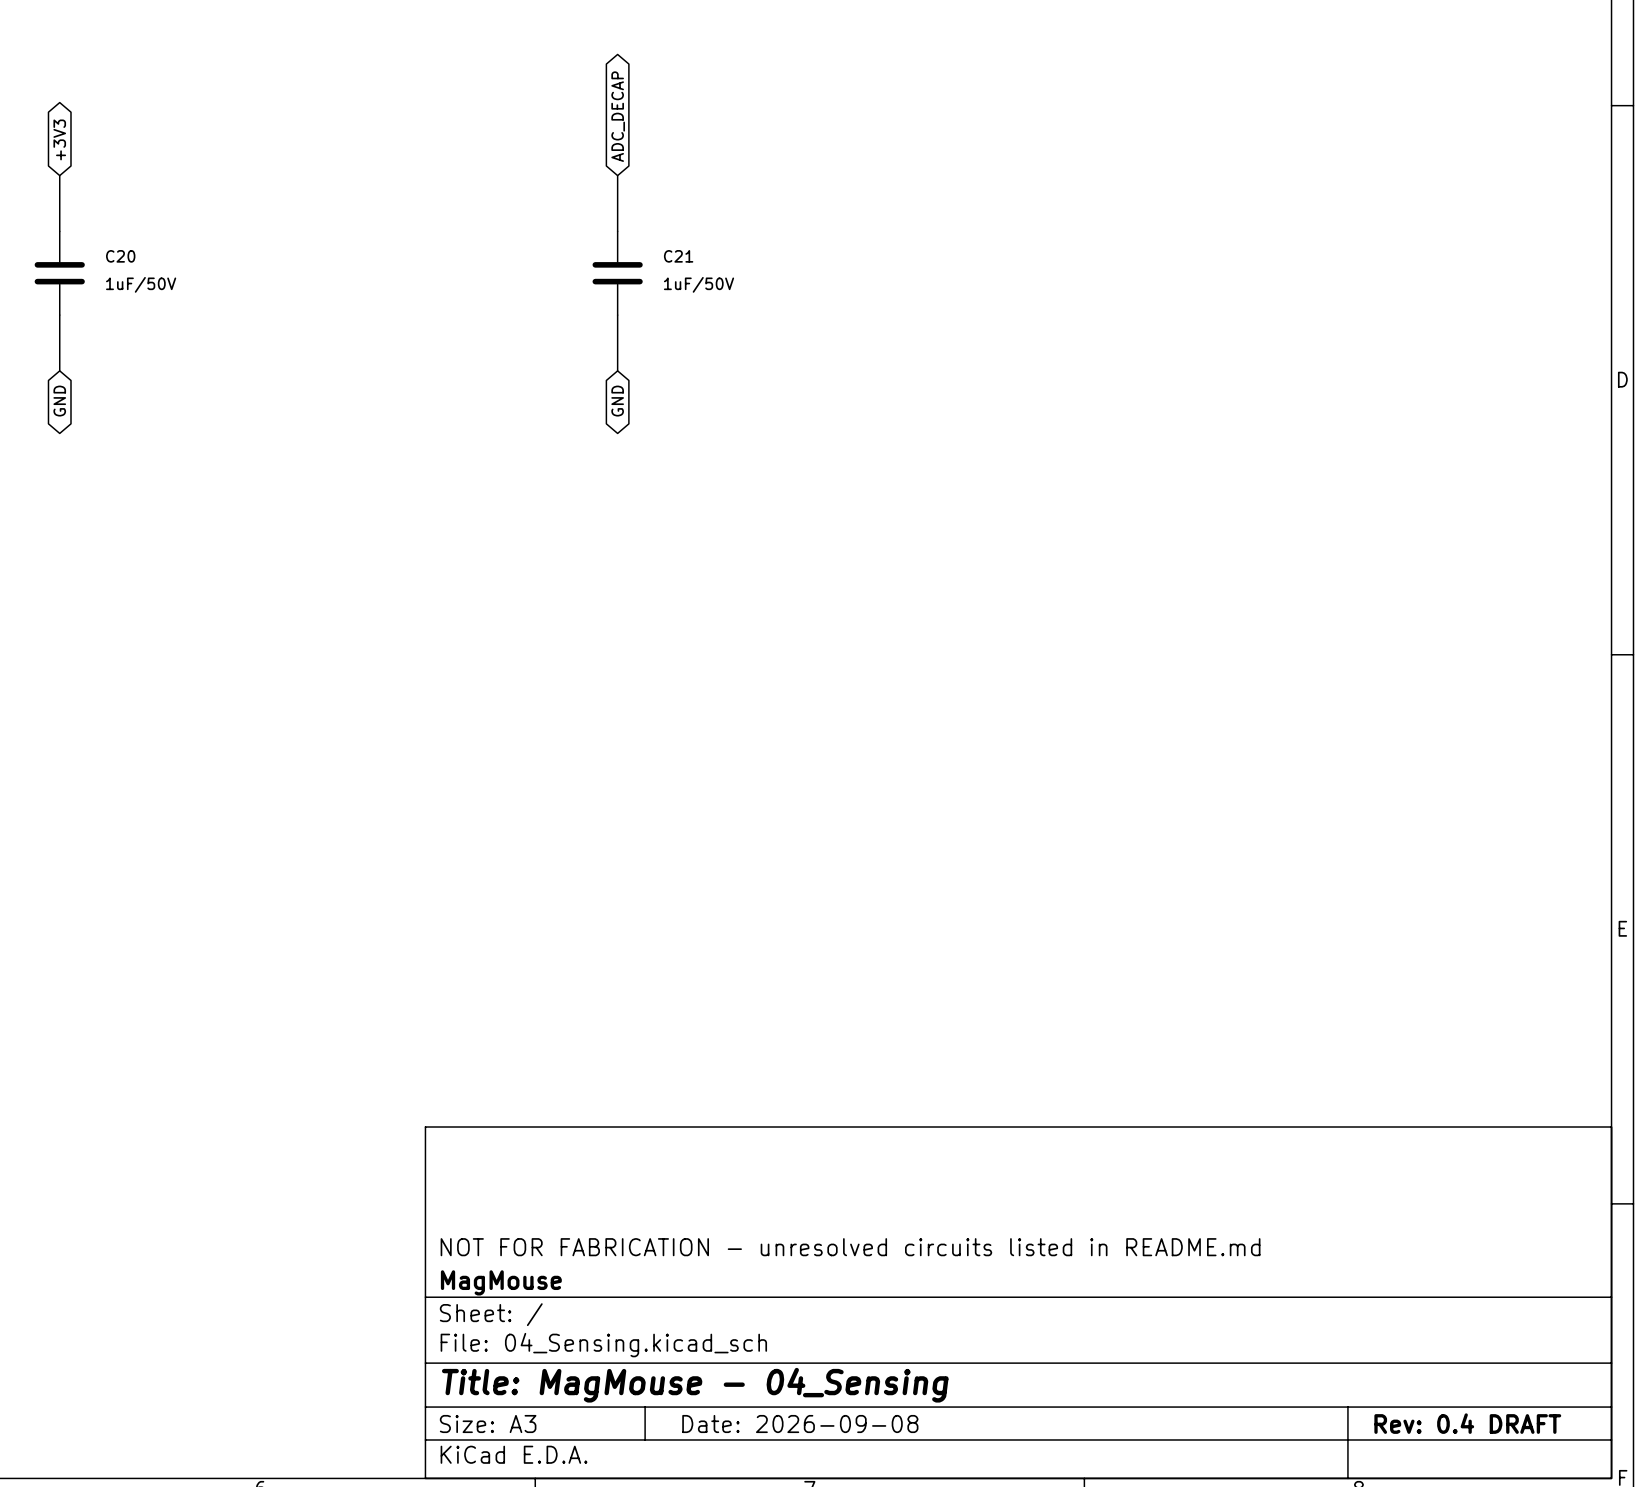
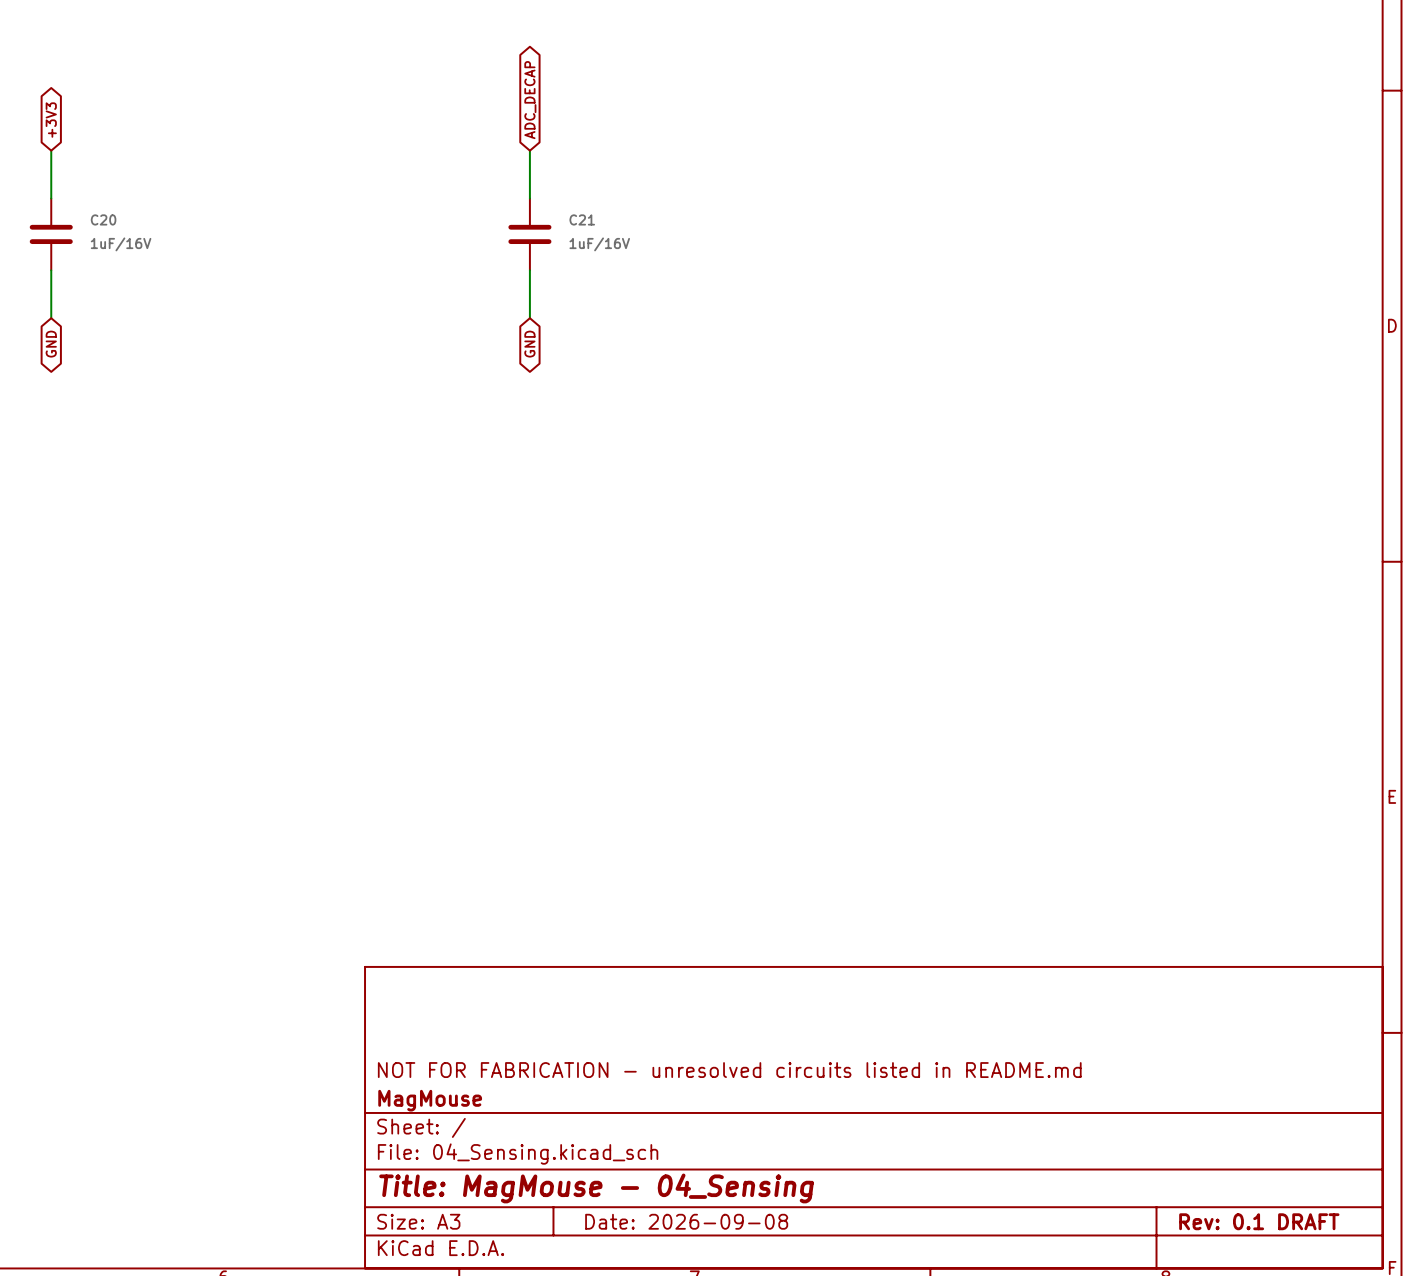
C20 value: 1uF/50V (141, 284) -> 1uF/16V (121, 244)
C21 value: 1uF/50V (699, 284) -> 1uF/16V (599, 244)
title block: Rev: 0.4 DRAFT (1467, 1423) -> Rev: 0.1 DRAFT (1259, 1221)

